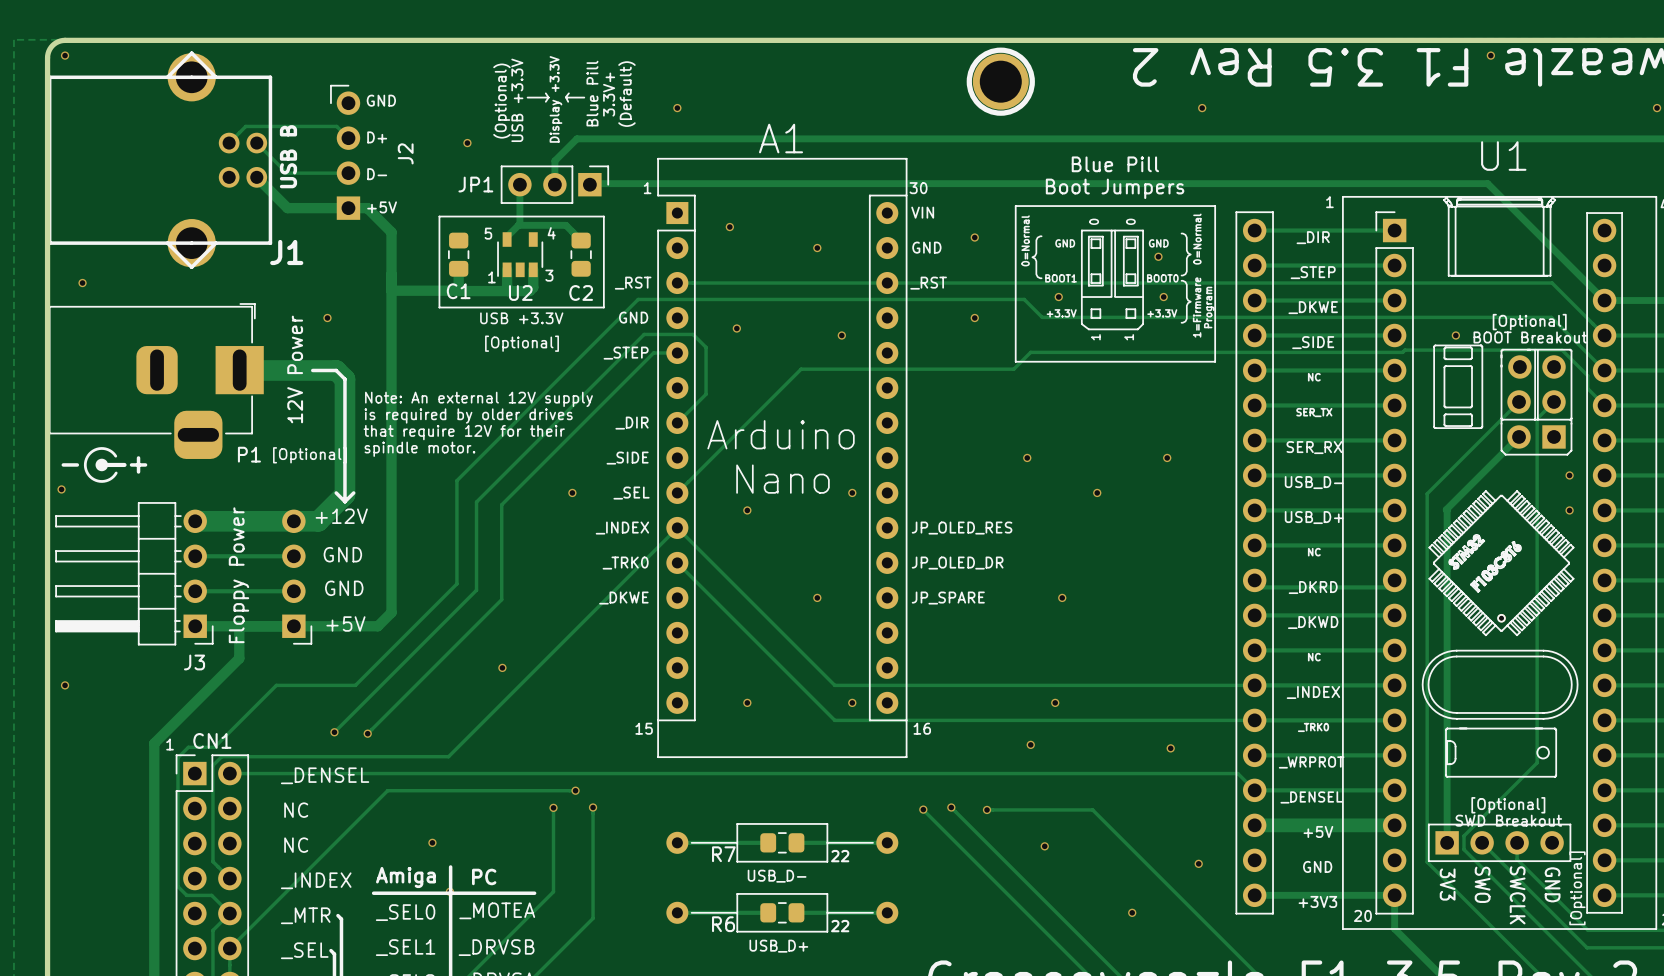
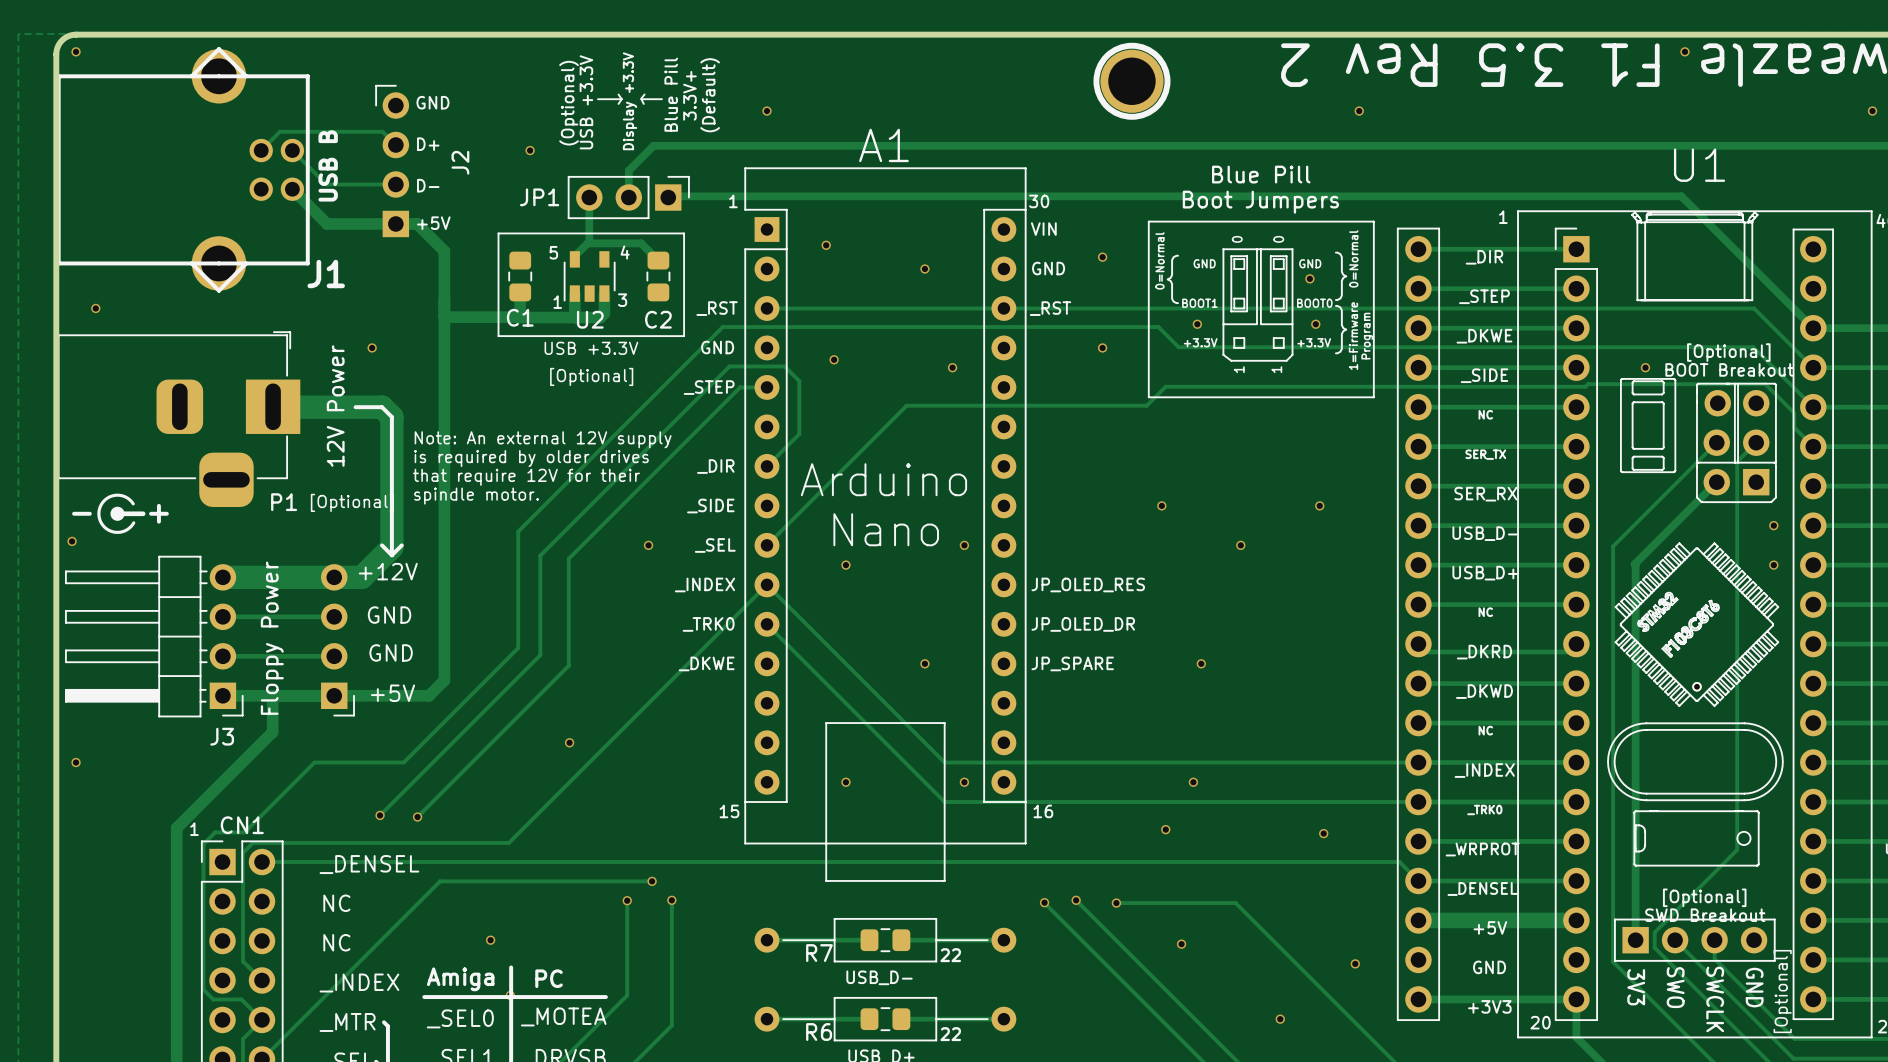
A1 footprint: [657, 157, 908, 758] -> [744, 167, 1027, 882]

